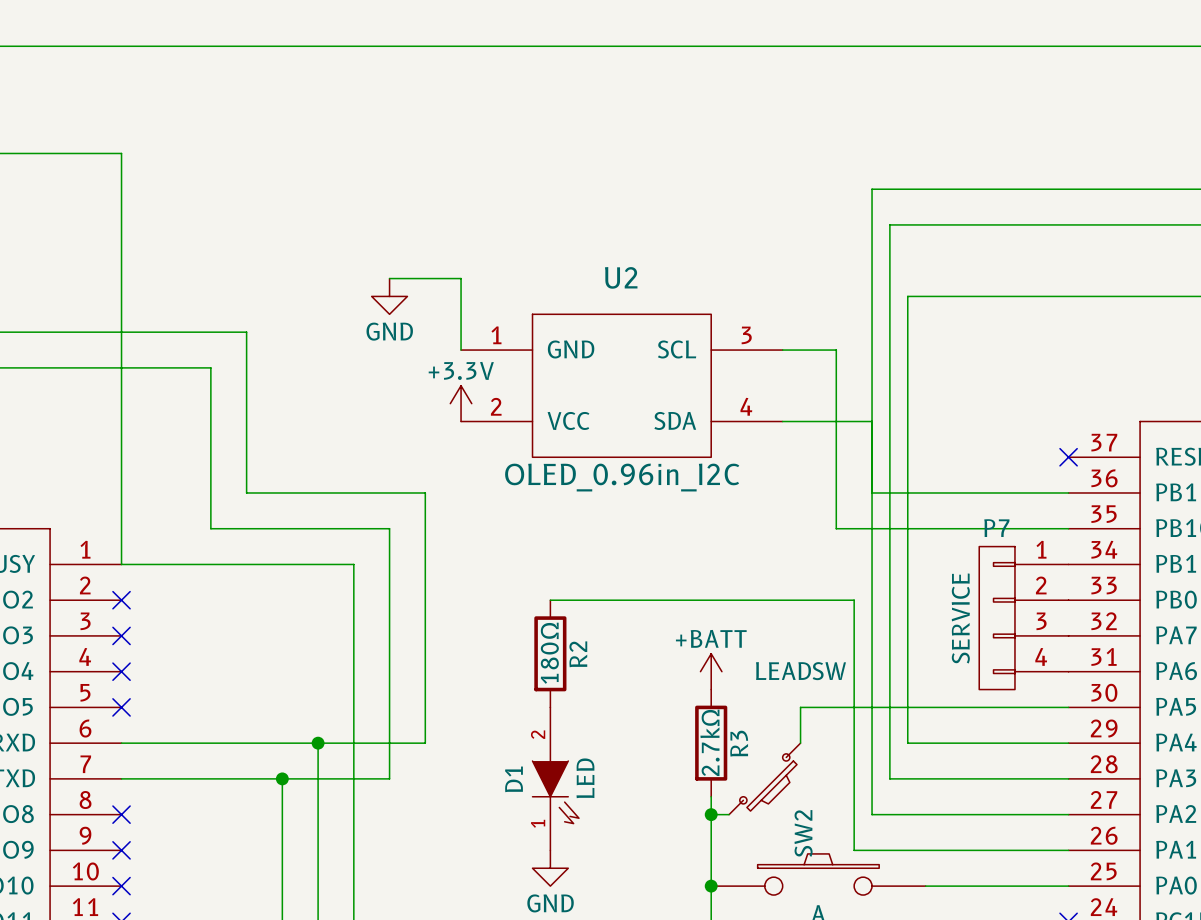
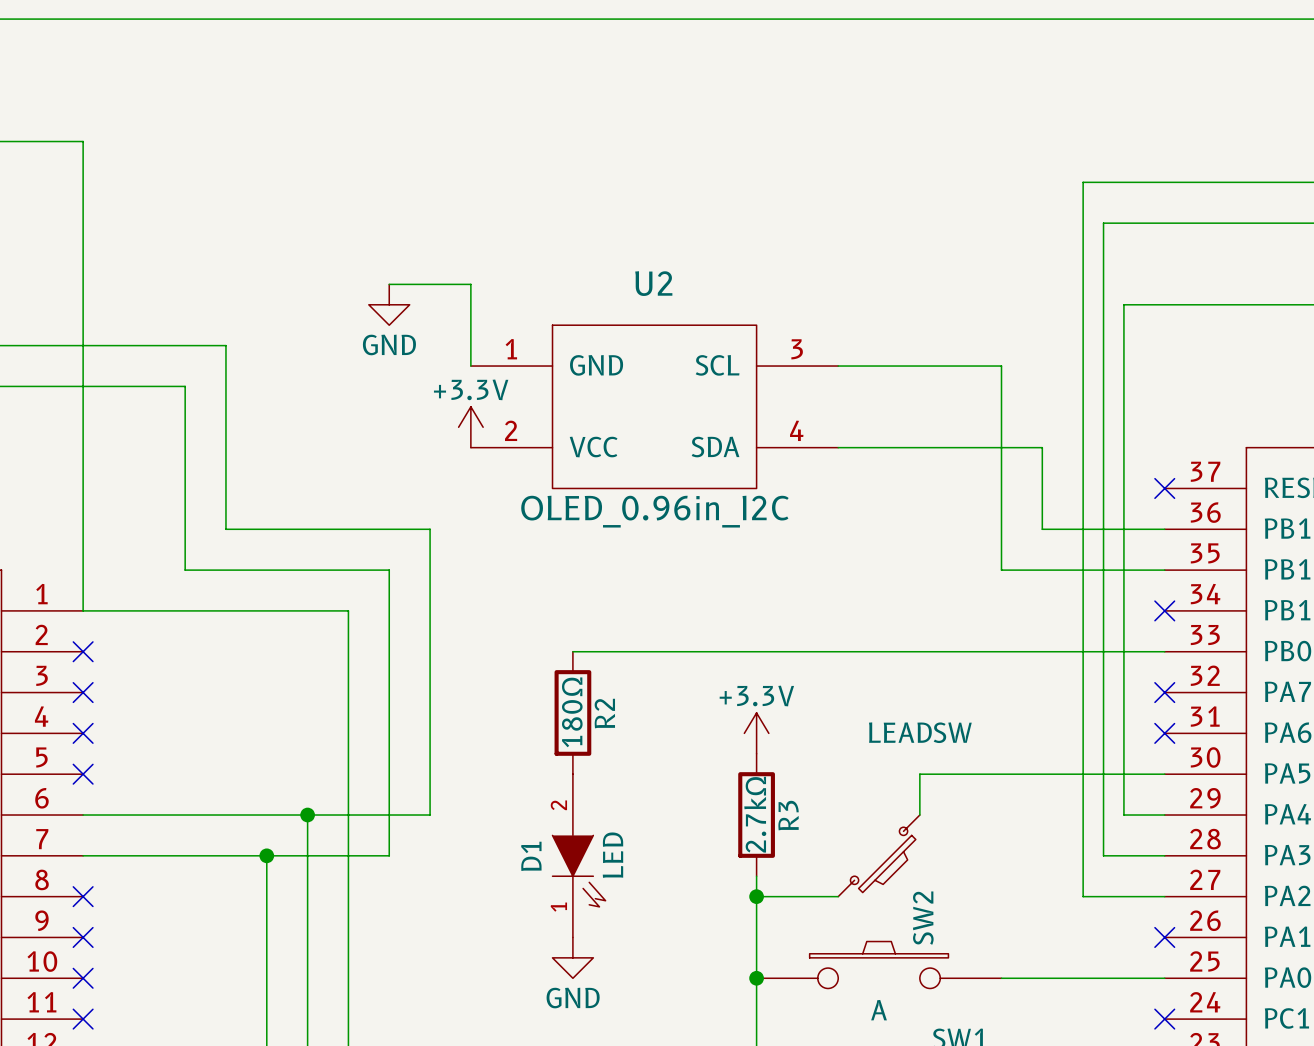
wire: (997, 189) (872, 189) (872, 814) (997, 814) -> (1083, 182) (1083, 896)
wire: (1014, 224) (889, 224) (889, 778) (1014, 778) -> (1103, 223) (1103, 855)
wire: (1032, 296) (907, 296) (907, 743) (1032, 743) -> (1123, 304) (1123, 815)
wire: (836, 350) (836, 528) (925, 528) -> (899, 366) (1001, 366) (1001, 570)
wire: (872, 492) (961, 492) -> (940, 447) (1042, 447) (1042, 529)
no-connect mark: none -> (1164, 610)
wire: (854, 600) (854, 707) (800, 707) (800, 743) -> (919, 651) (1164, 651)
P7: SERVICE (1023, 618) -> none
no-connect mark: none -> (1164, 692)
power symbol: +BATT (711, 671) -> +3.3V (756, 733)
no-connect mark: none -> (1164, 733)
wire: (854, 743) (854, 850) (1068, 850) -> none
SW2 position: (764, 778) -> (879, 855)
wire: none -> (777, 896) (838, 896)
no-connect mark: none -> (1164, 937)

